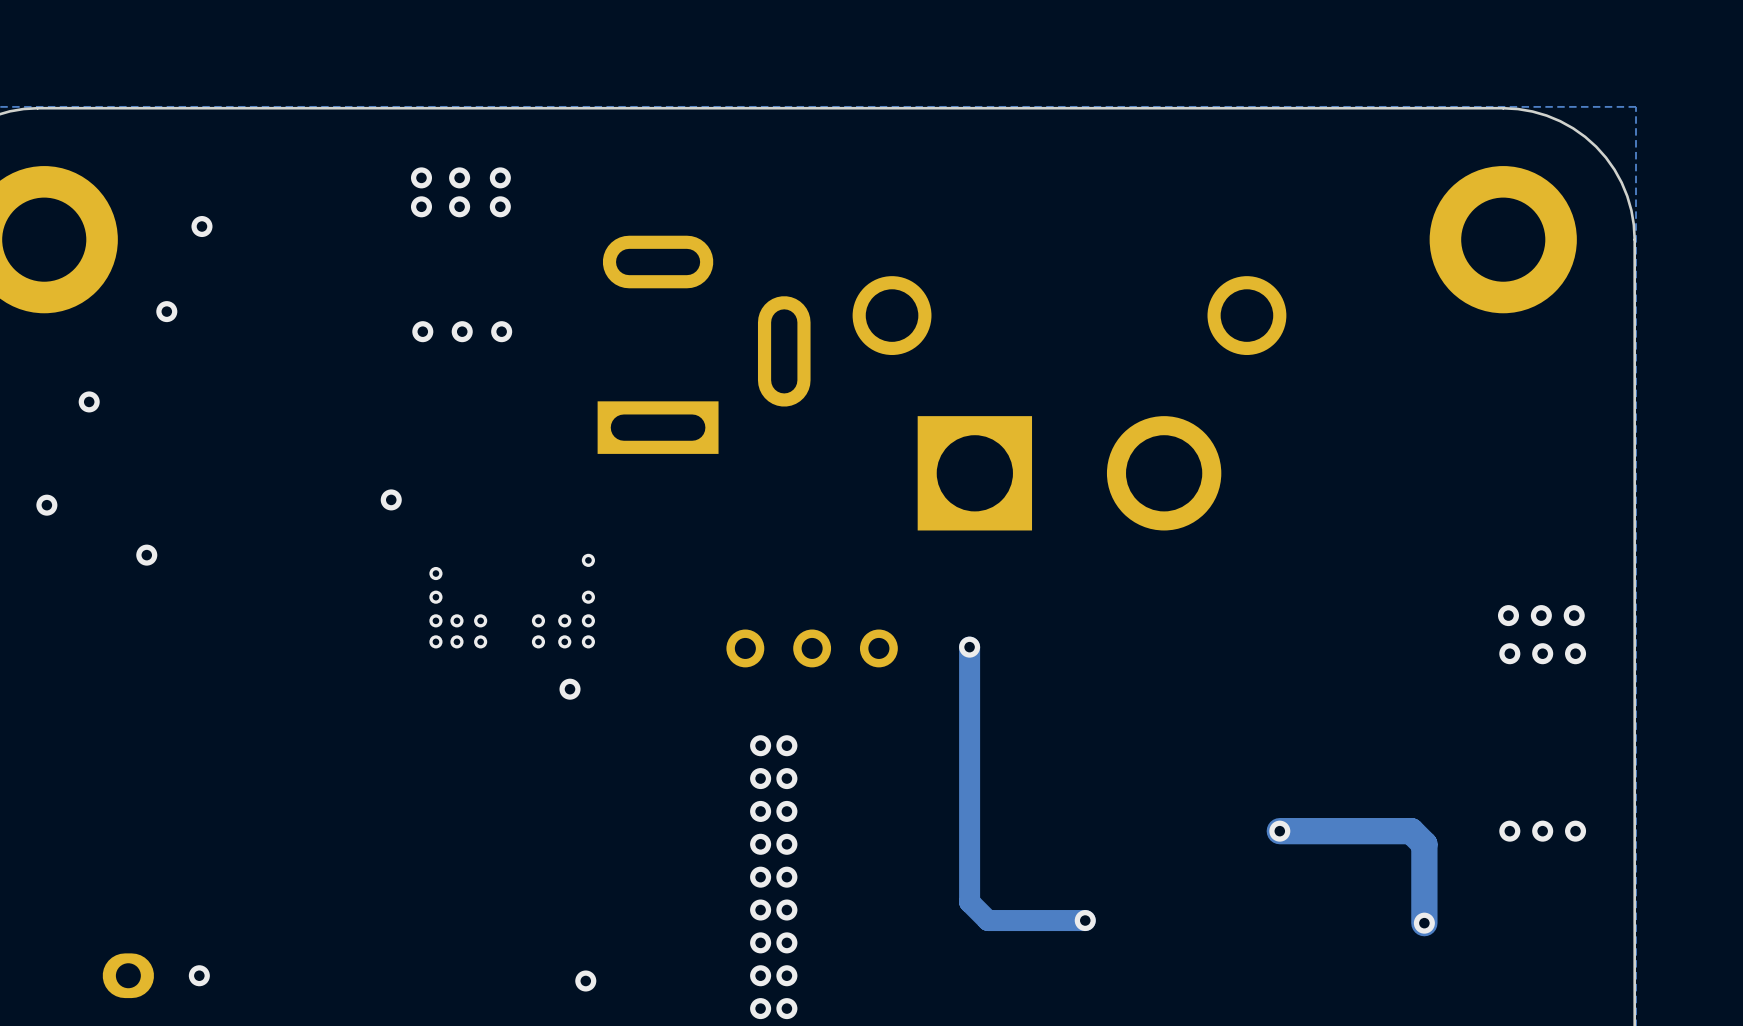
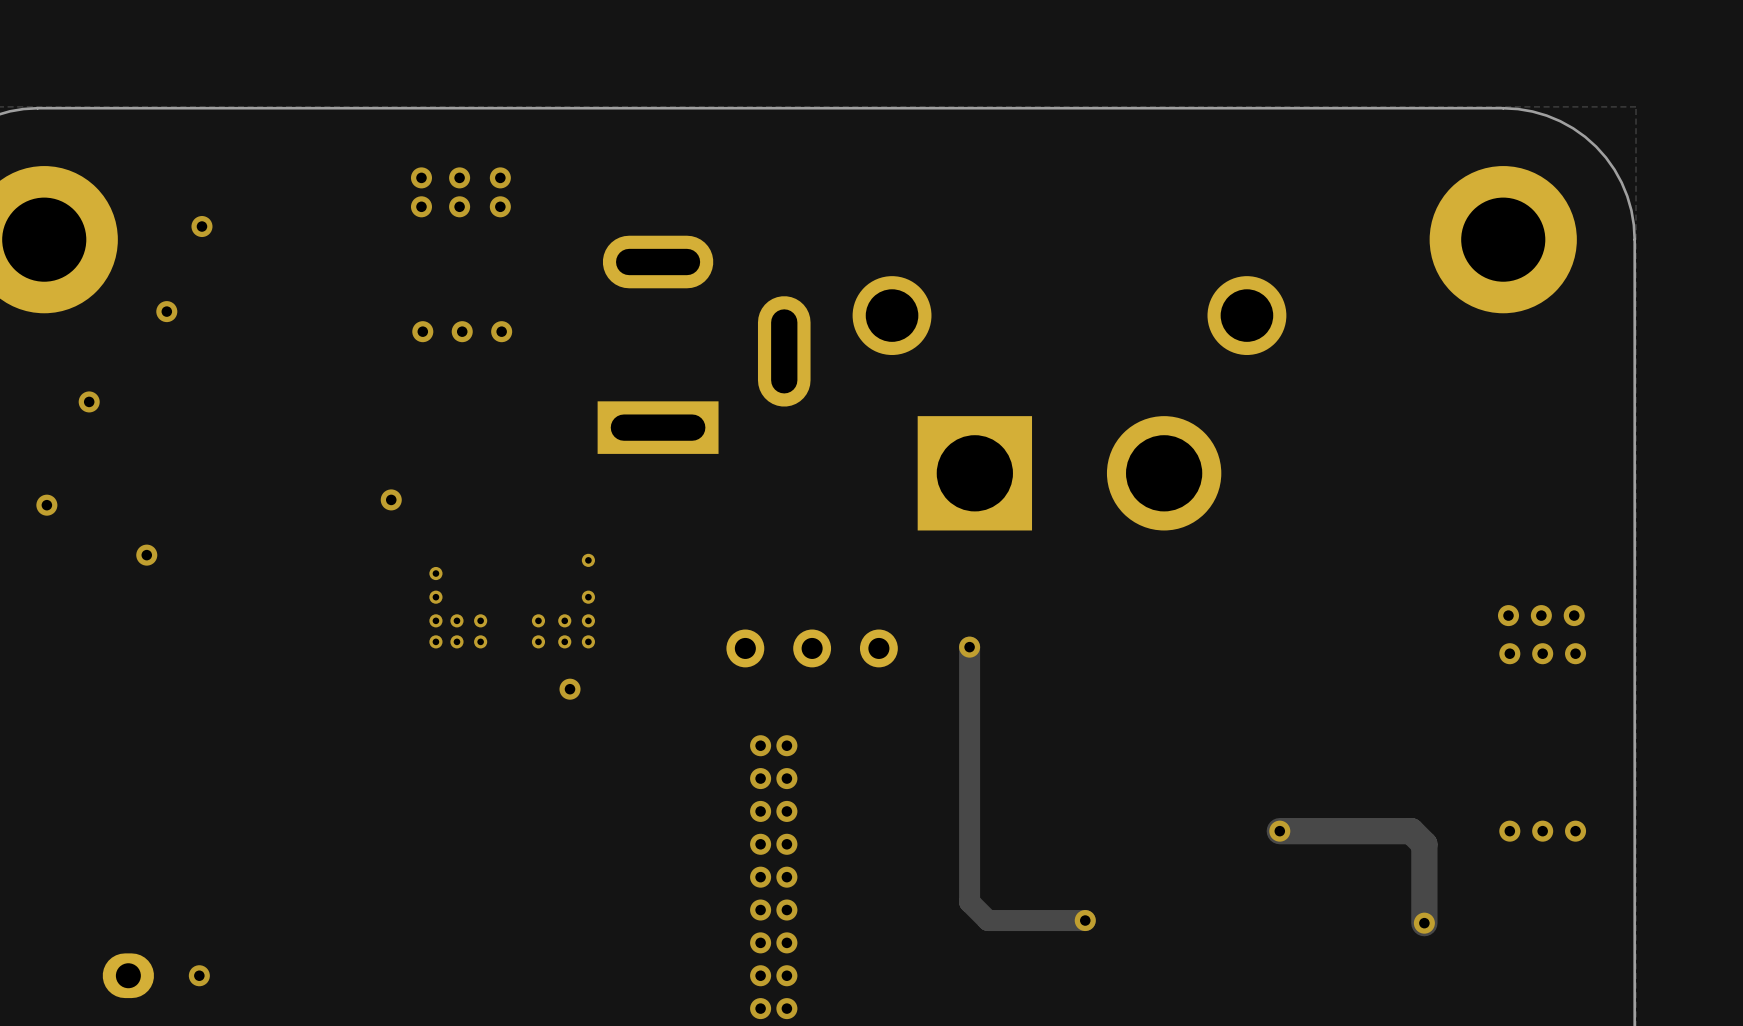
via: (585, 980) -> none

